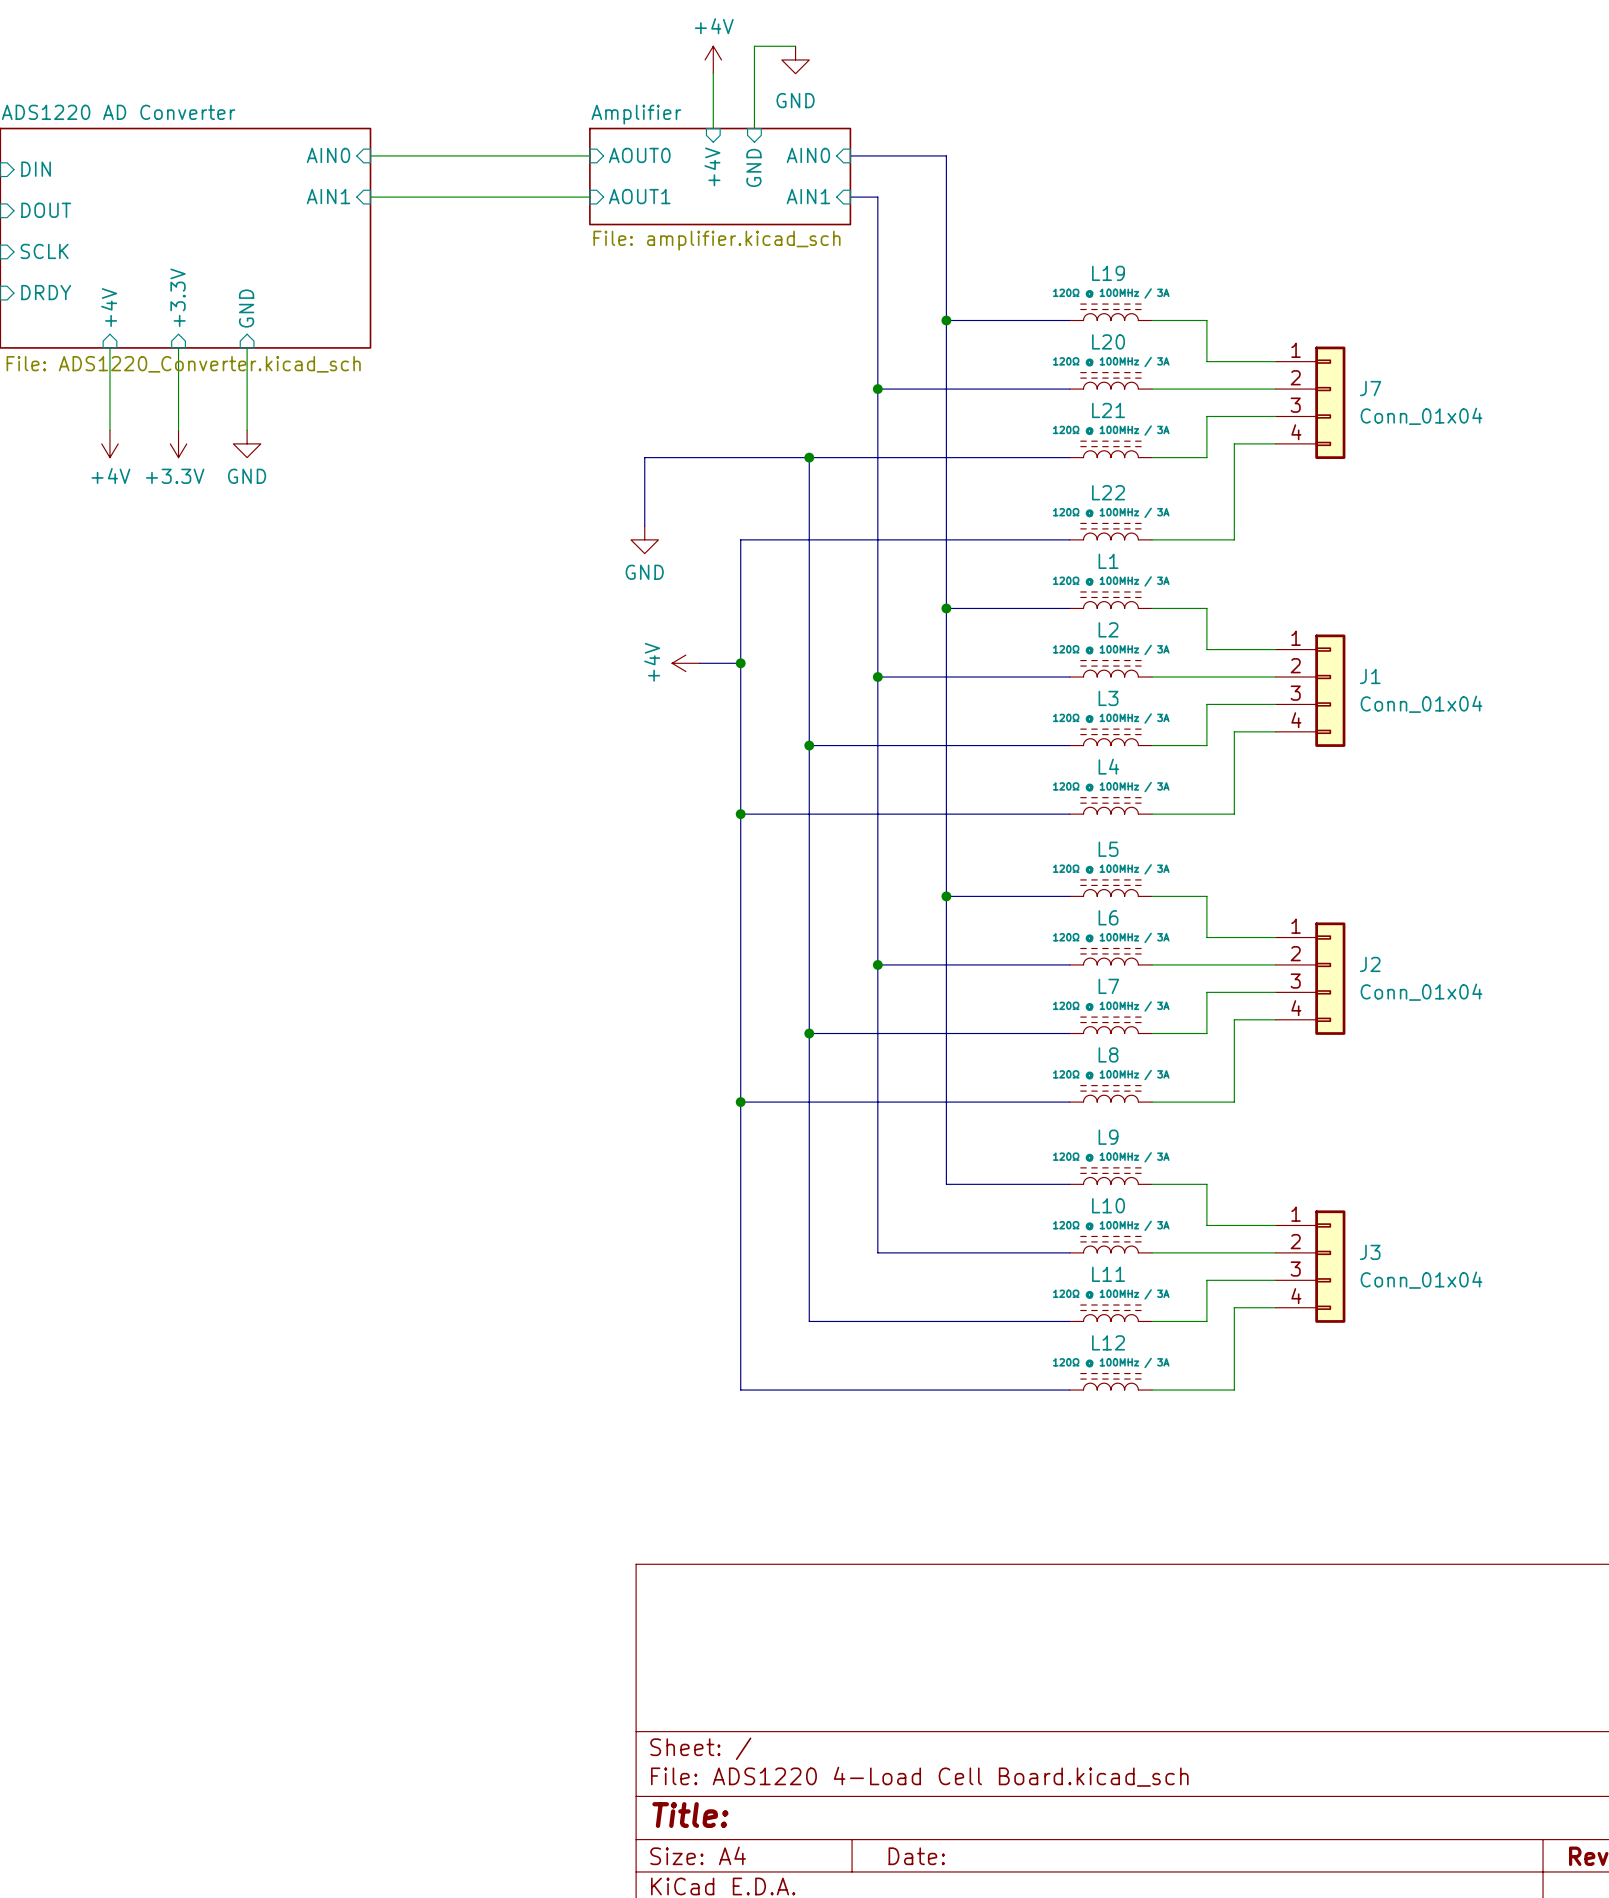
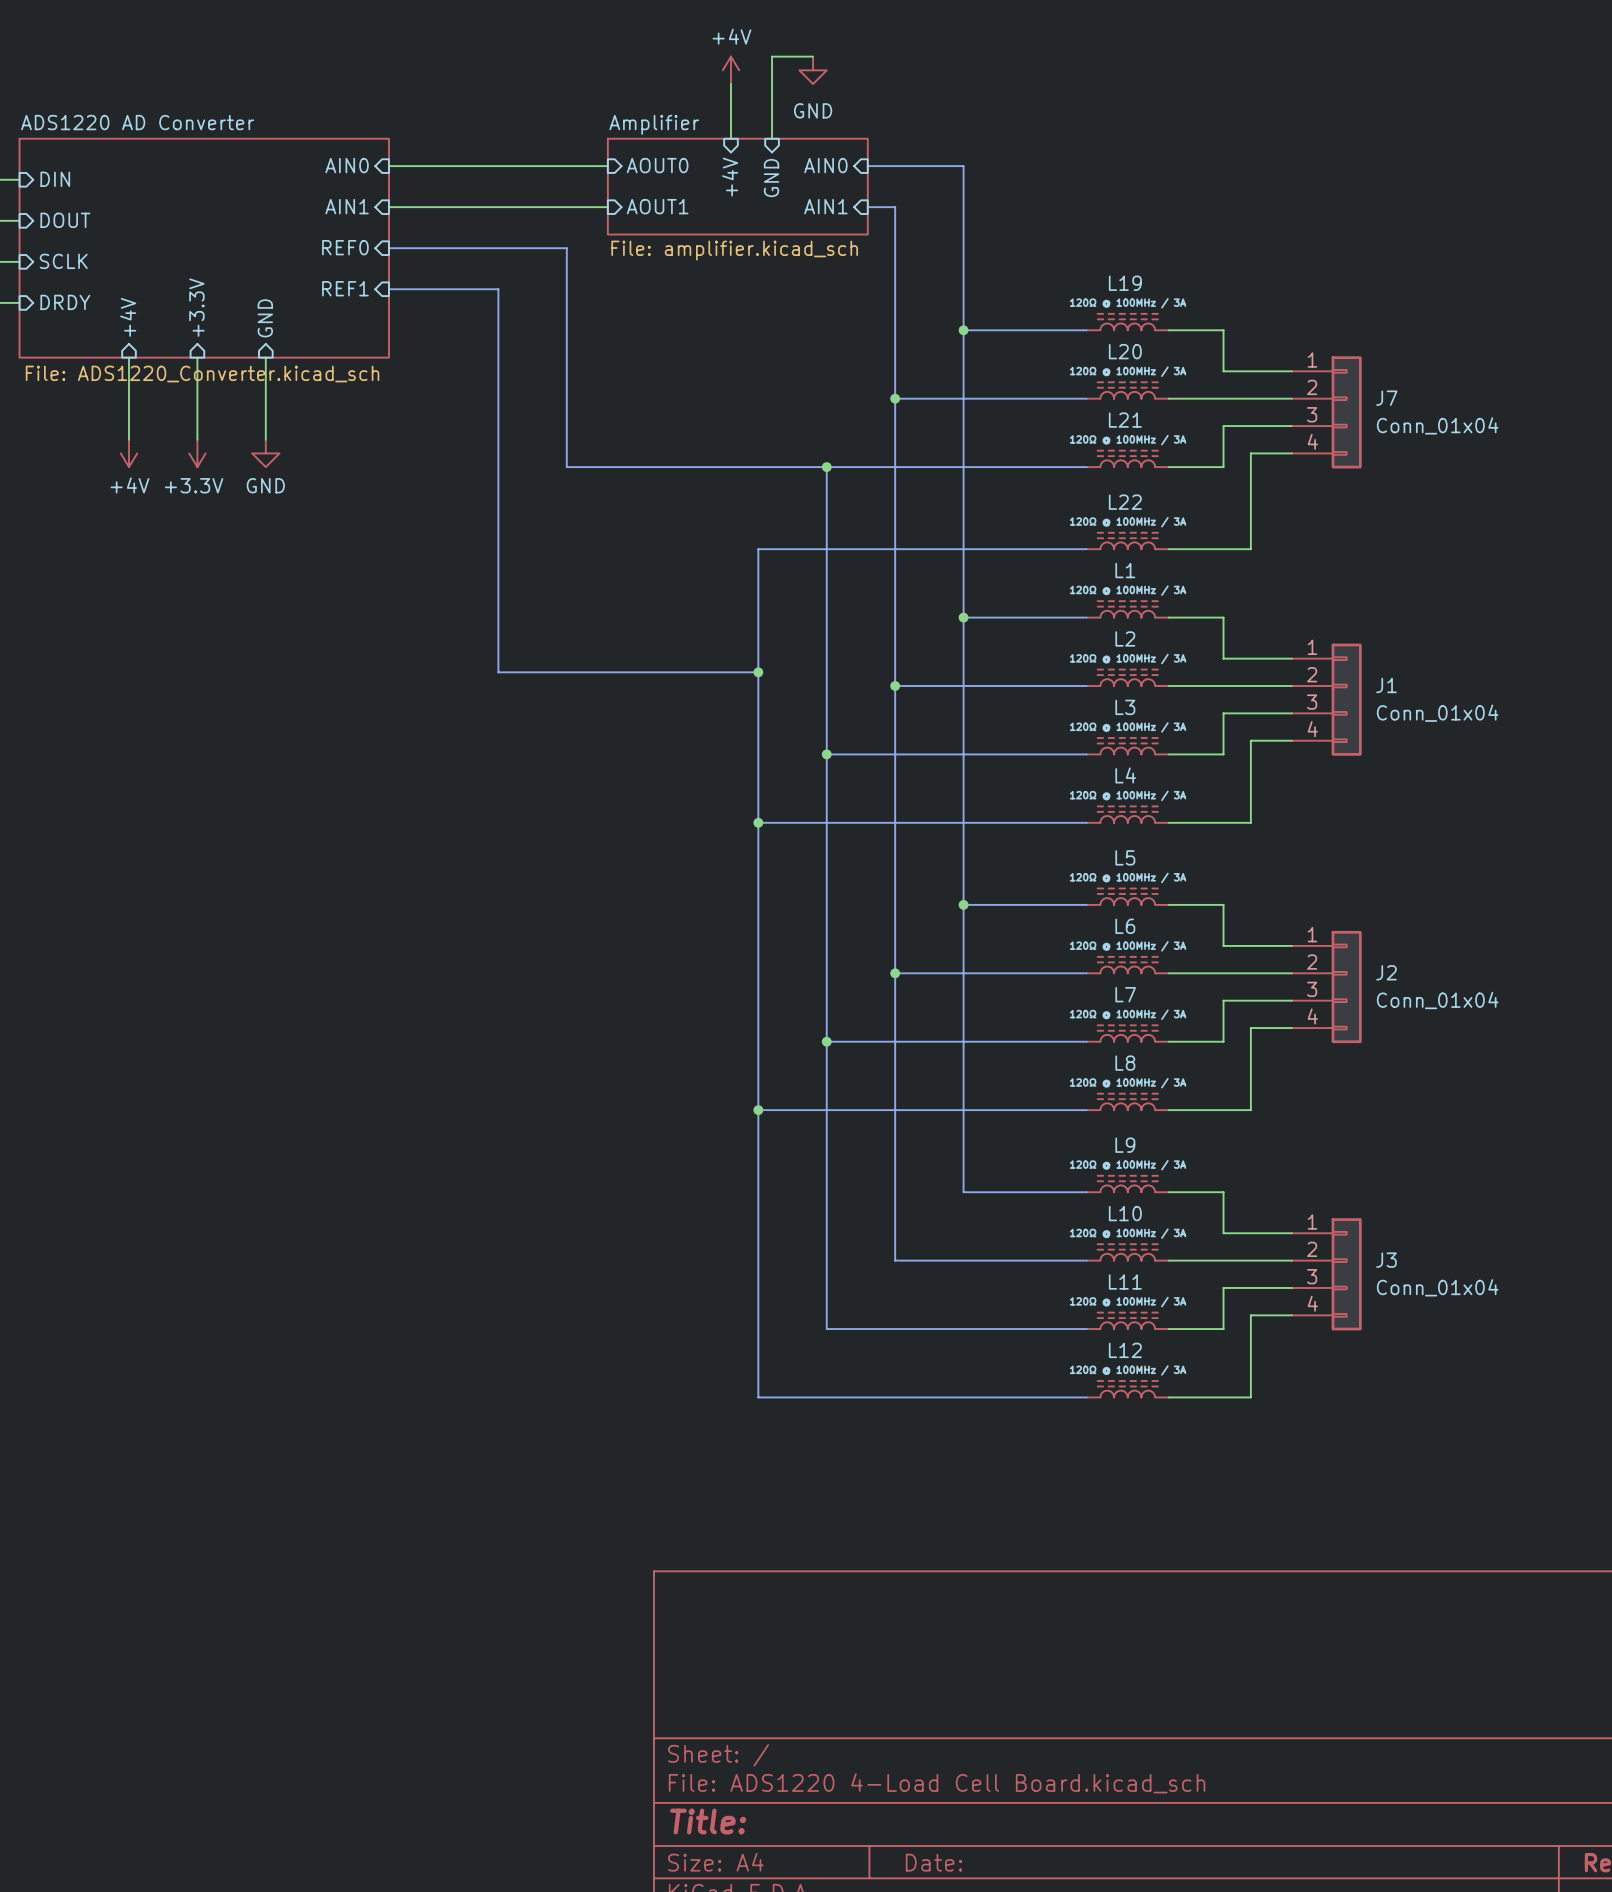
sheet pin: none -> REF0 (345, 247)
sheet pin: none -> REF1 (345, 288)
bus: none -> (388, 289) (498, 289) (498, 672) (717, 672)
bus: (644, 457) (644, 526) -> (662, 467) (566, 467) (566, 248) (388, 248)
power symbol: GND (644, 539) -> none
power symbol: +4V (685, 663) -> none

